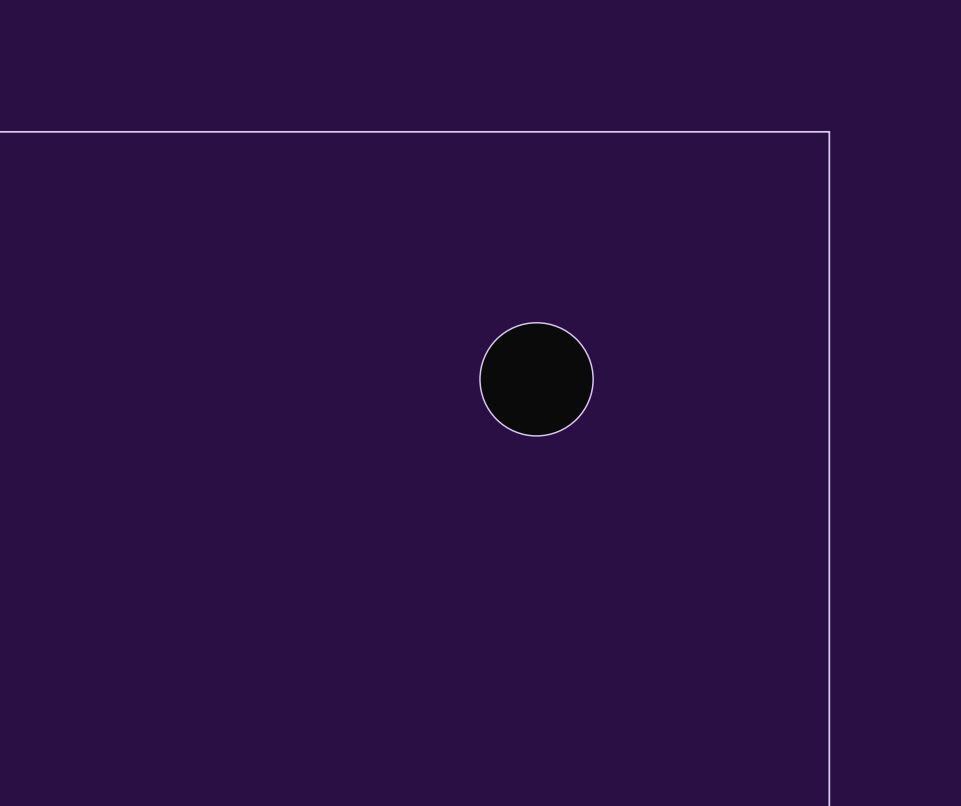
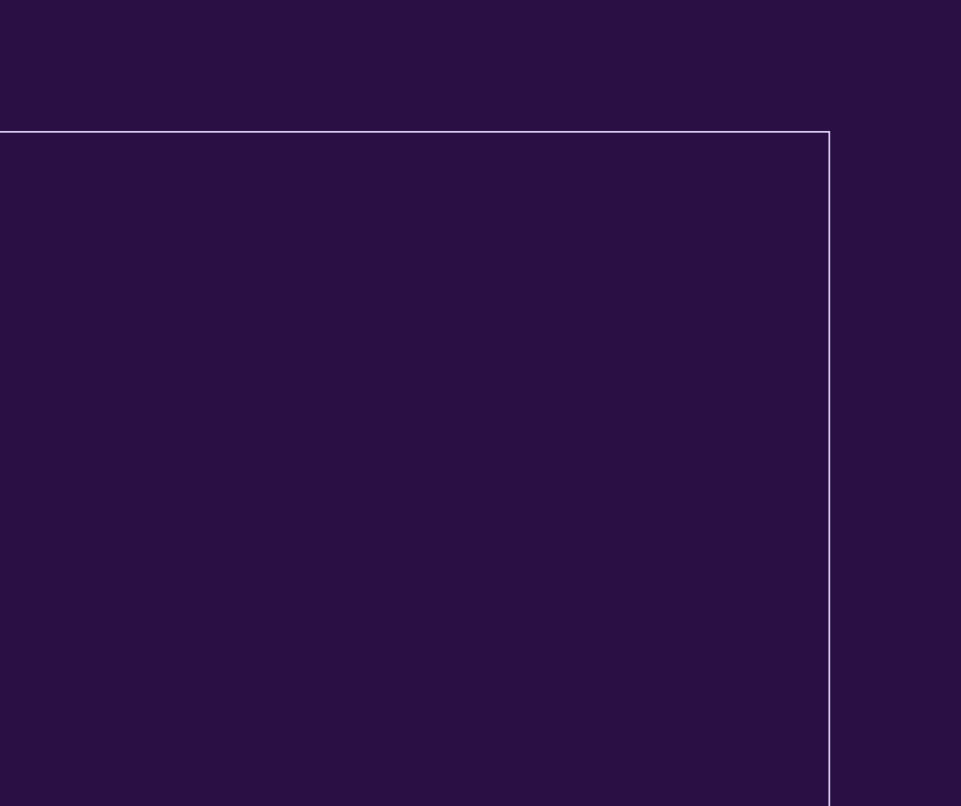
part: (536, 379) -> none

